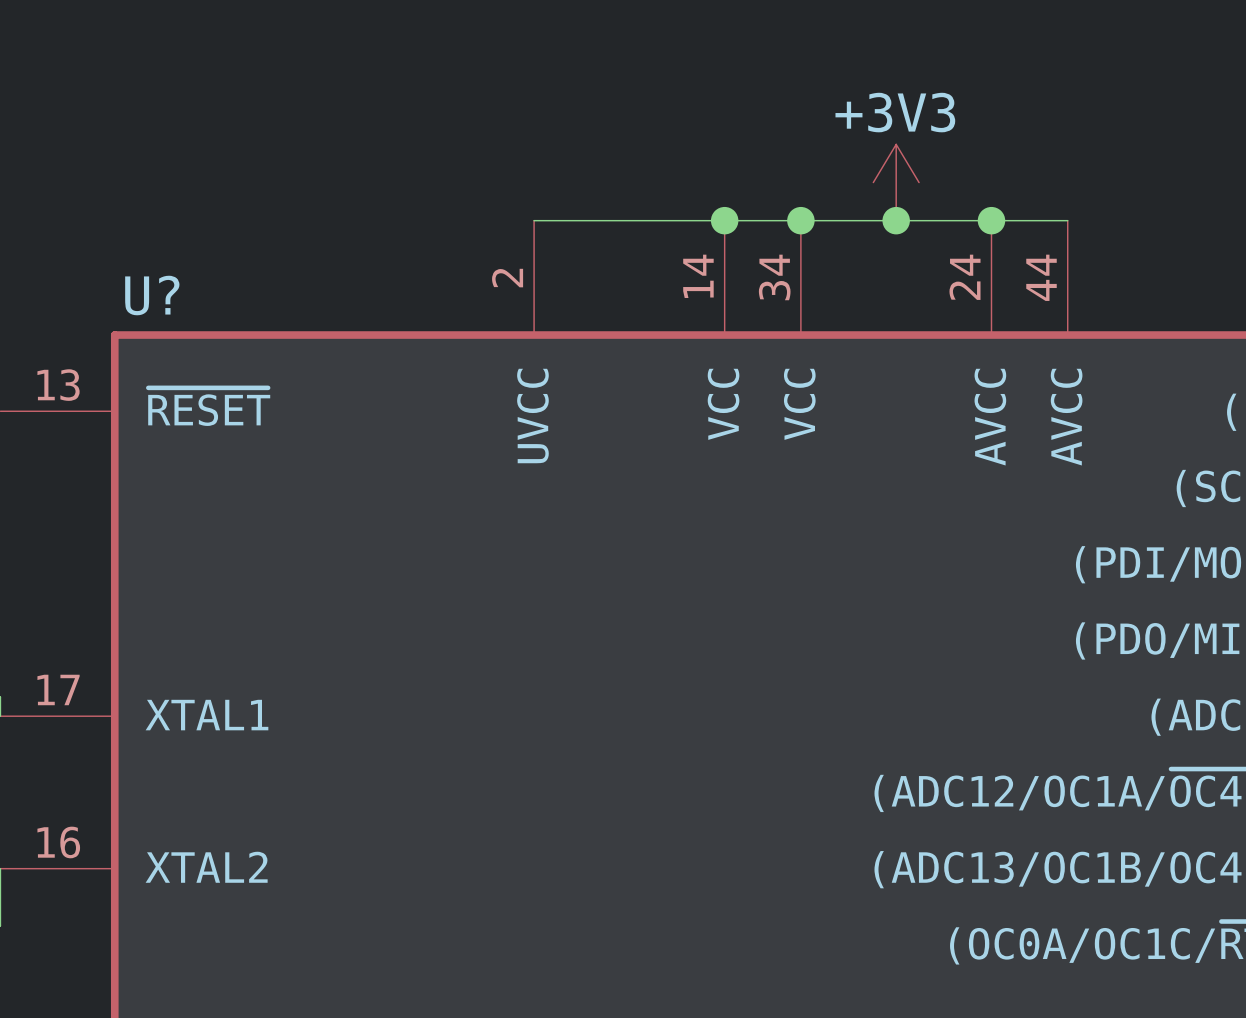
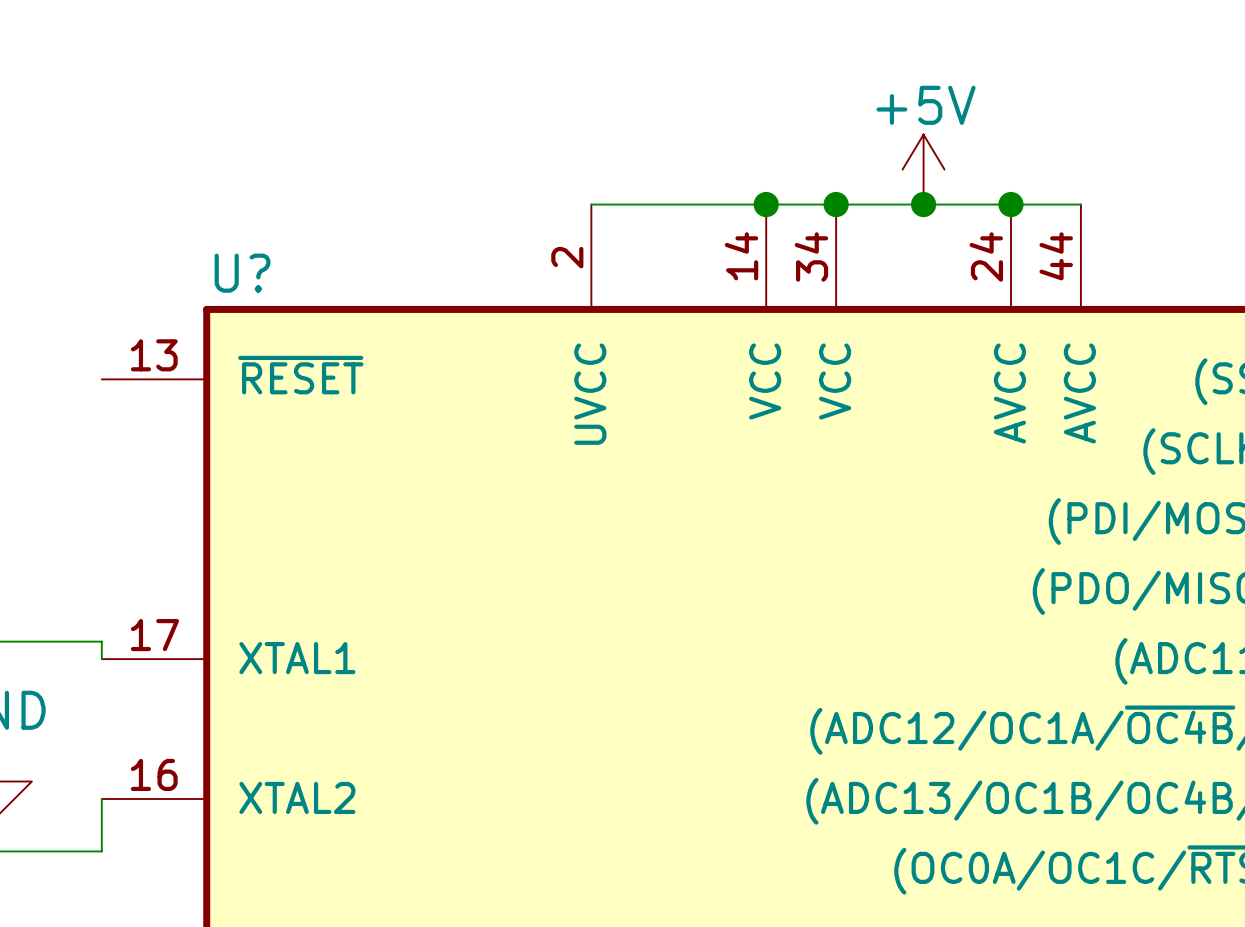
power symbol: +3V3 (896, 182) -> +5V (923, 169)

